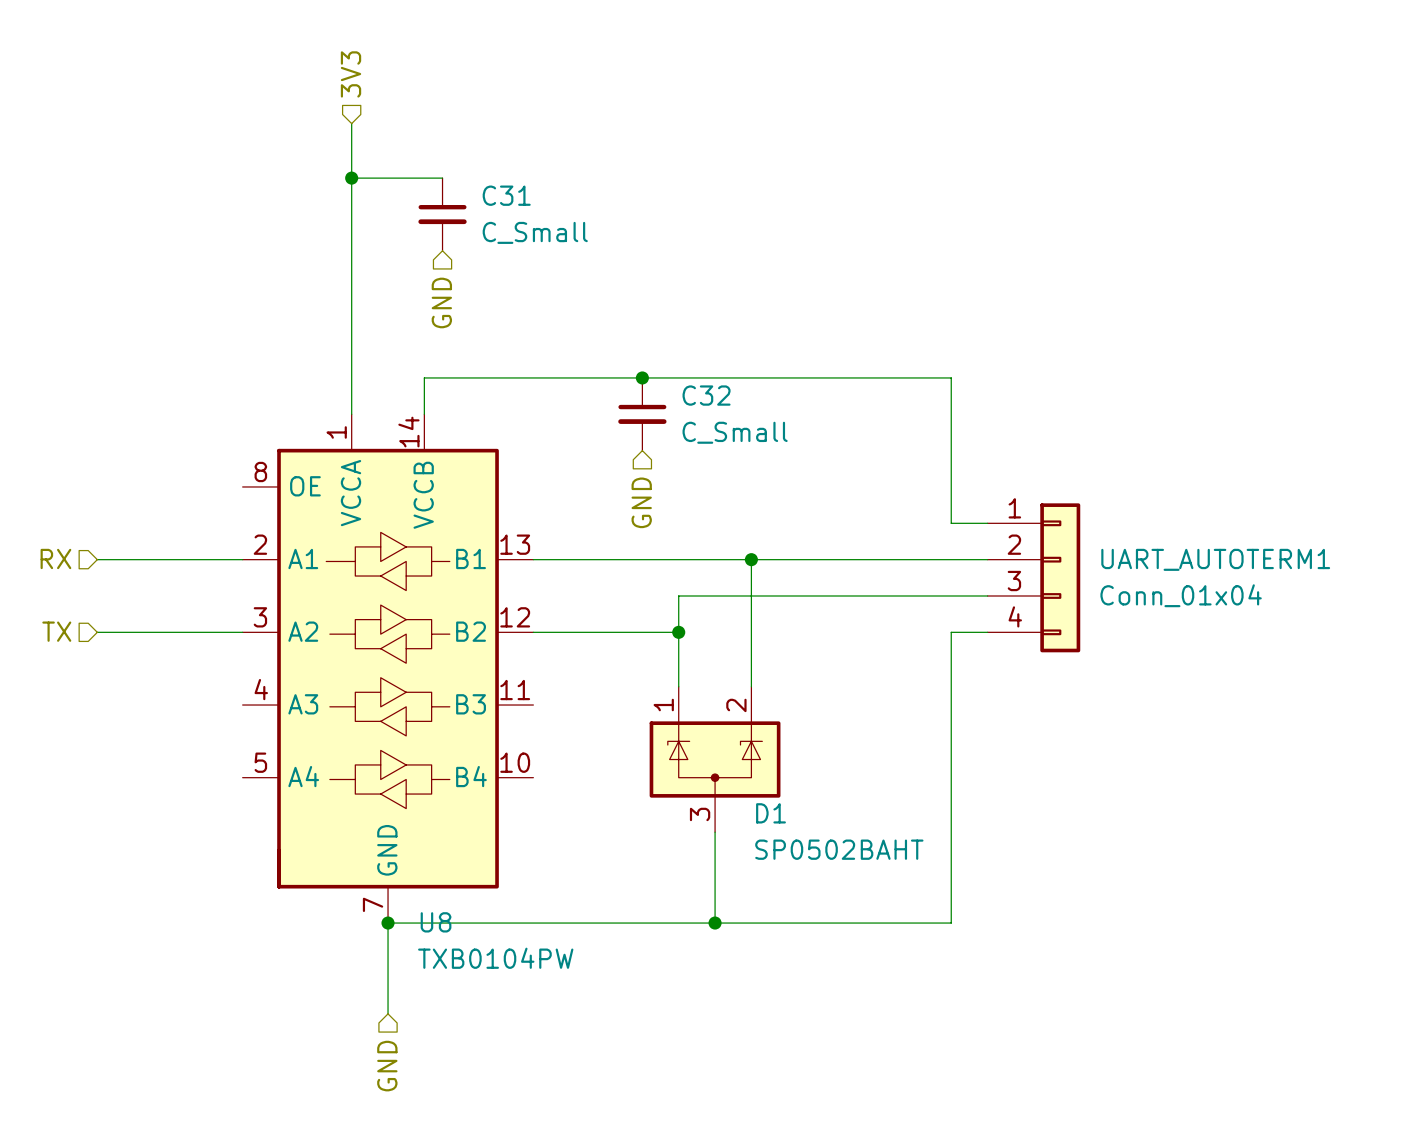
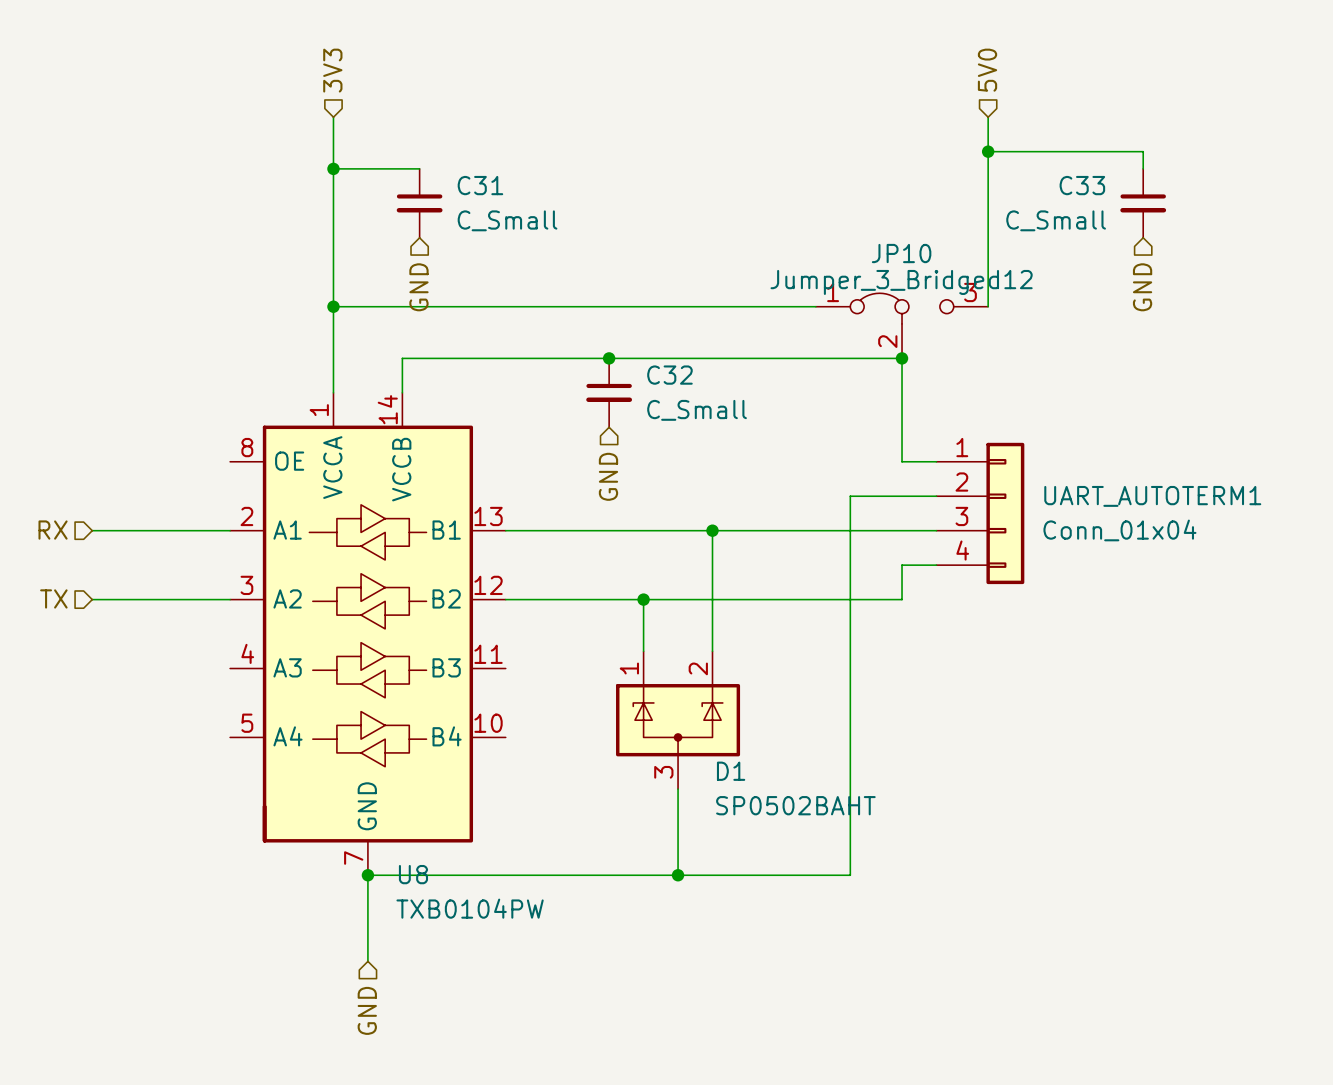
hierarchical label: none -> 5V0 (987, 70)
wire: none -> (988, 117) (988, 306)
wire: none -> (988, 151) (1143, 151) (1143, 168)
junction: none -> (988, 151)
C33: none -> C_Small (1143, 203)
hierarchical label: none -> GND (1142, 287)
wire: none -> (333, 306) (815, 306)
junction: none -> (333, 306)
JP10: none -> Jumper_3_Bridged12 (902, 325)
junction: none -> (902, 358)
wire: (951, 486) (951, 523) -> (902, 461) (936, 461)
UART_AUTOTERM1 position: (1033, 577) -> (980, 513)
wire: (951, 595) (678, 595) (678, 632) -> (902, 565) (902, 599) (643, 599)
wire: (987, 632) (951, 632) (951, 923) (896, 923) -> (902, 496) (850, 496) (850, 875)

